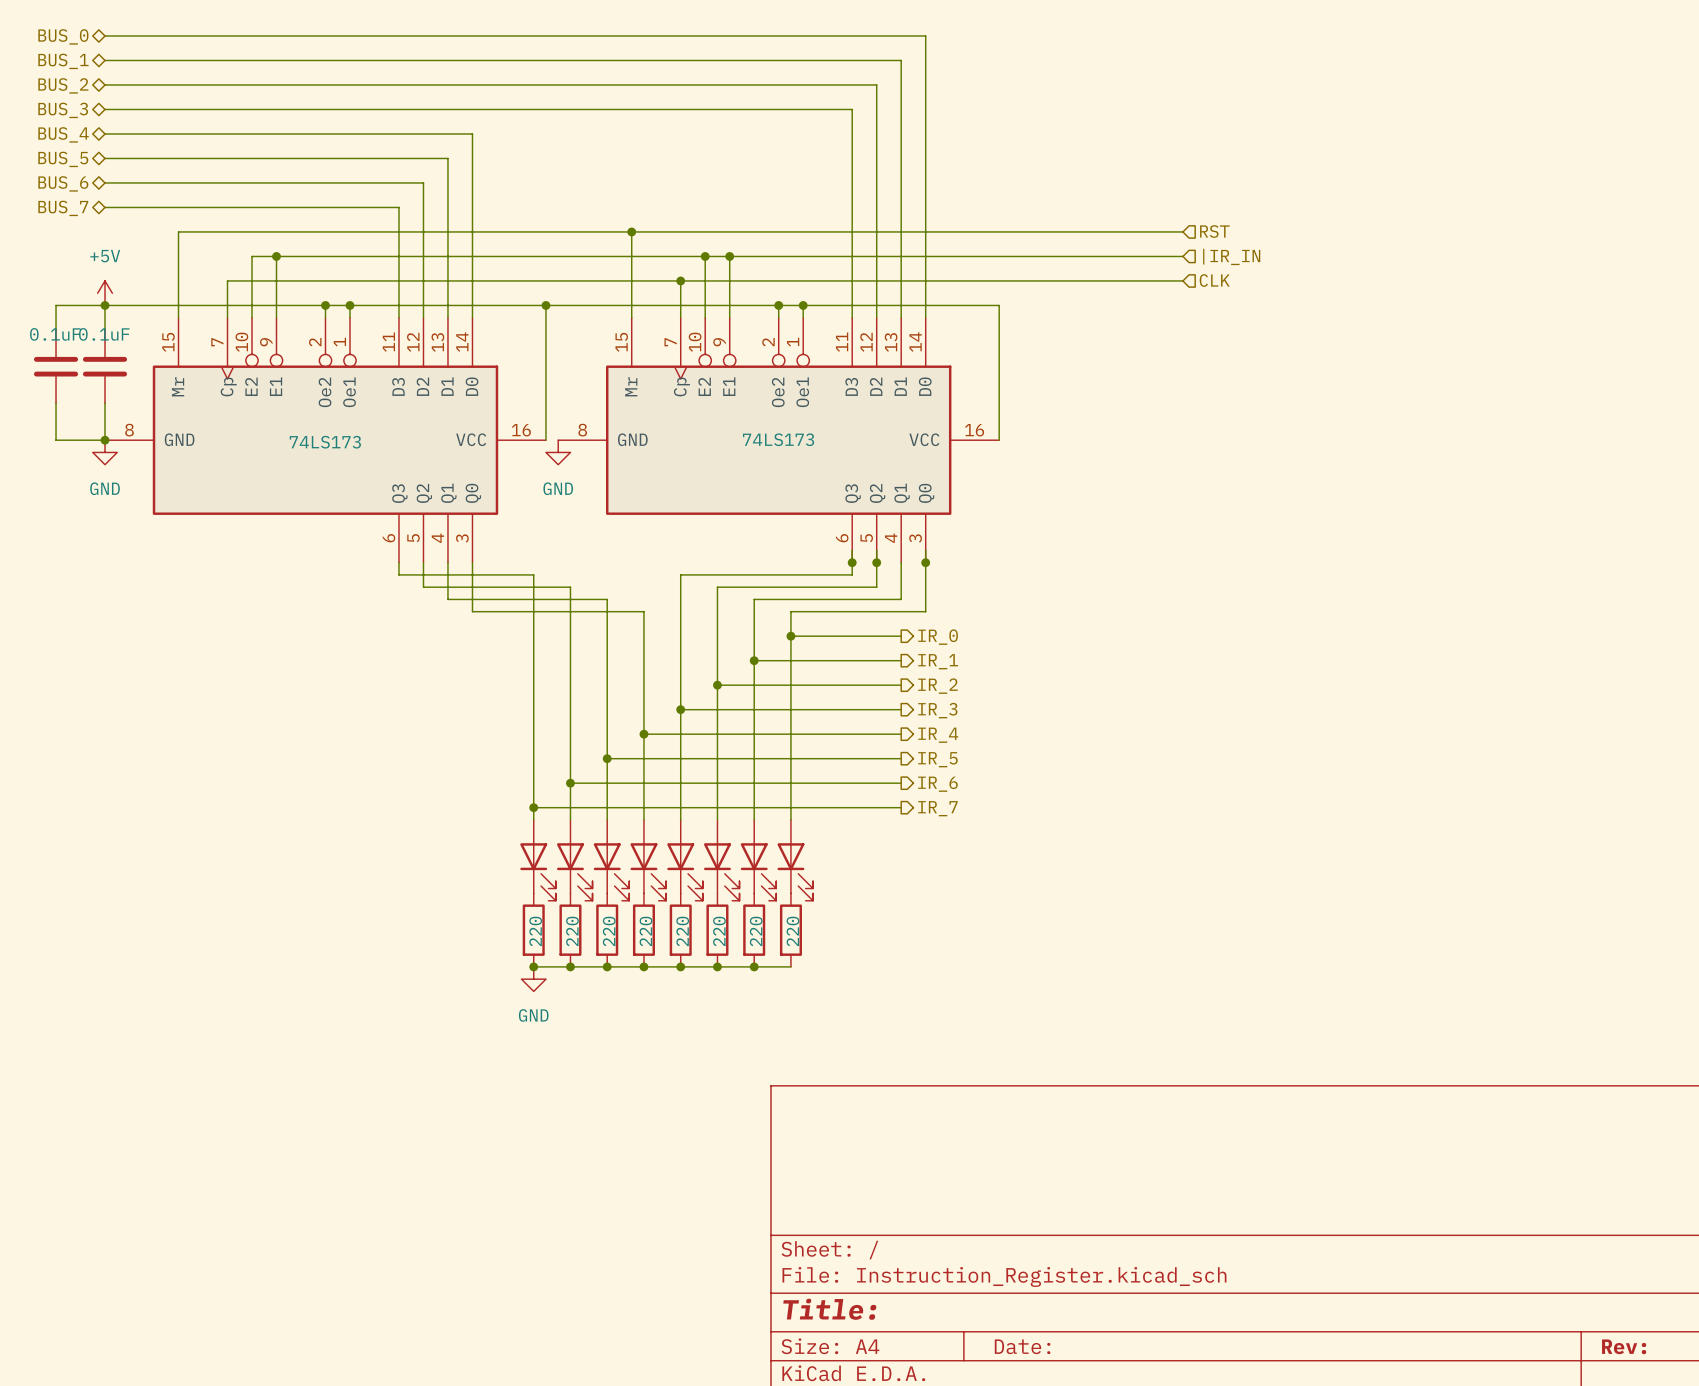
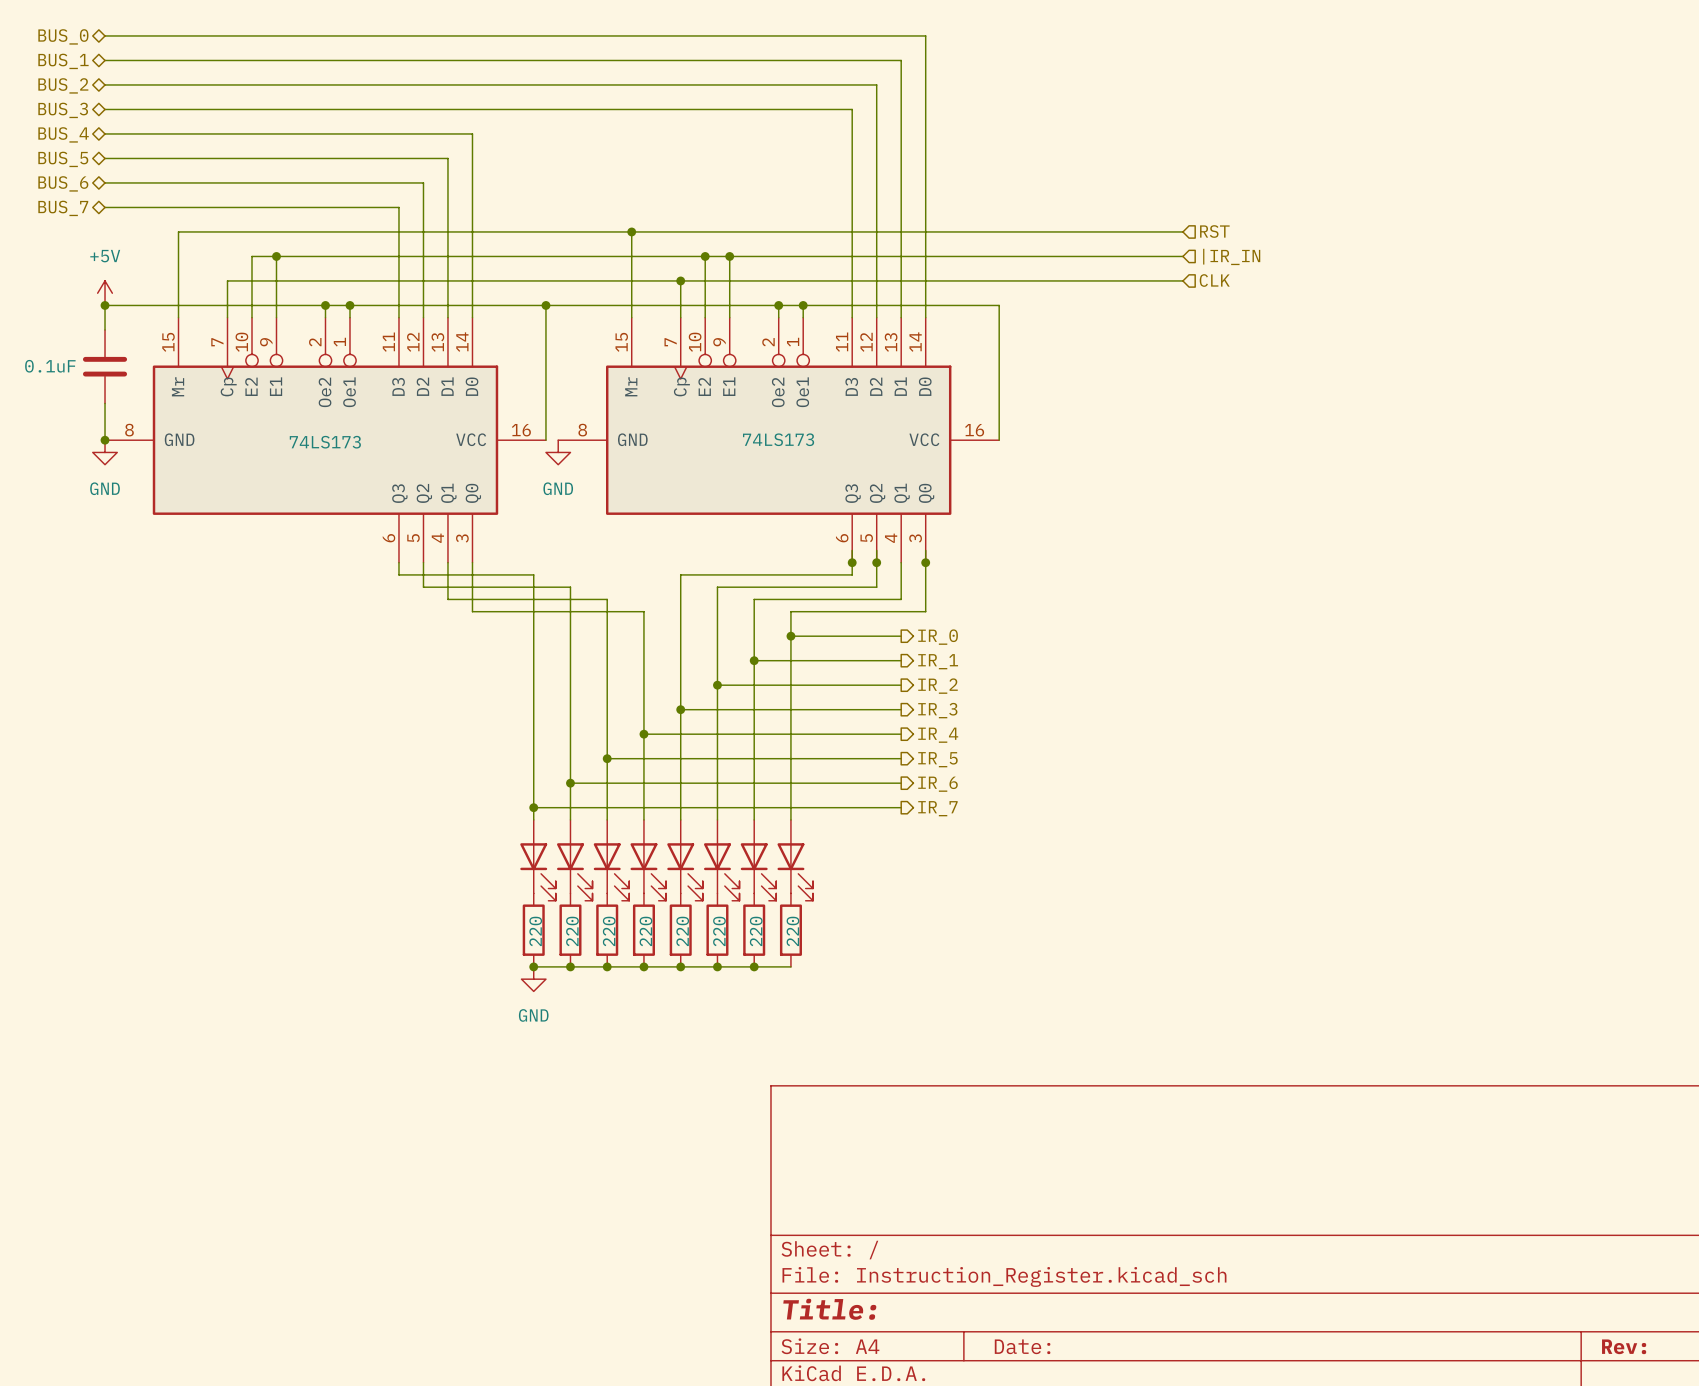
wire: (105, 305) (56, 305) (56, 329) -> none
part value position: 0.1uF (104, 334) -> 0.1uF (50, 366)
part: 0.1uF (56, 366) -> none
wire: (56, 403) (56, 440) (105, 440) -> none

